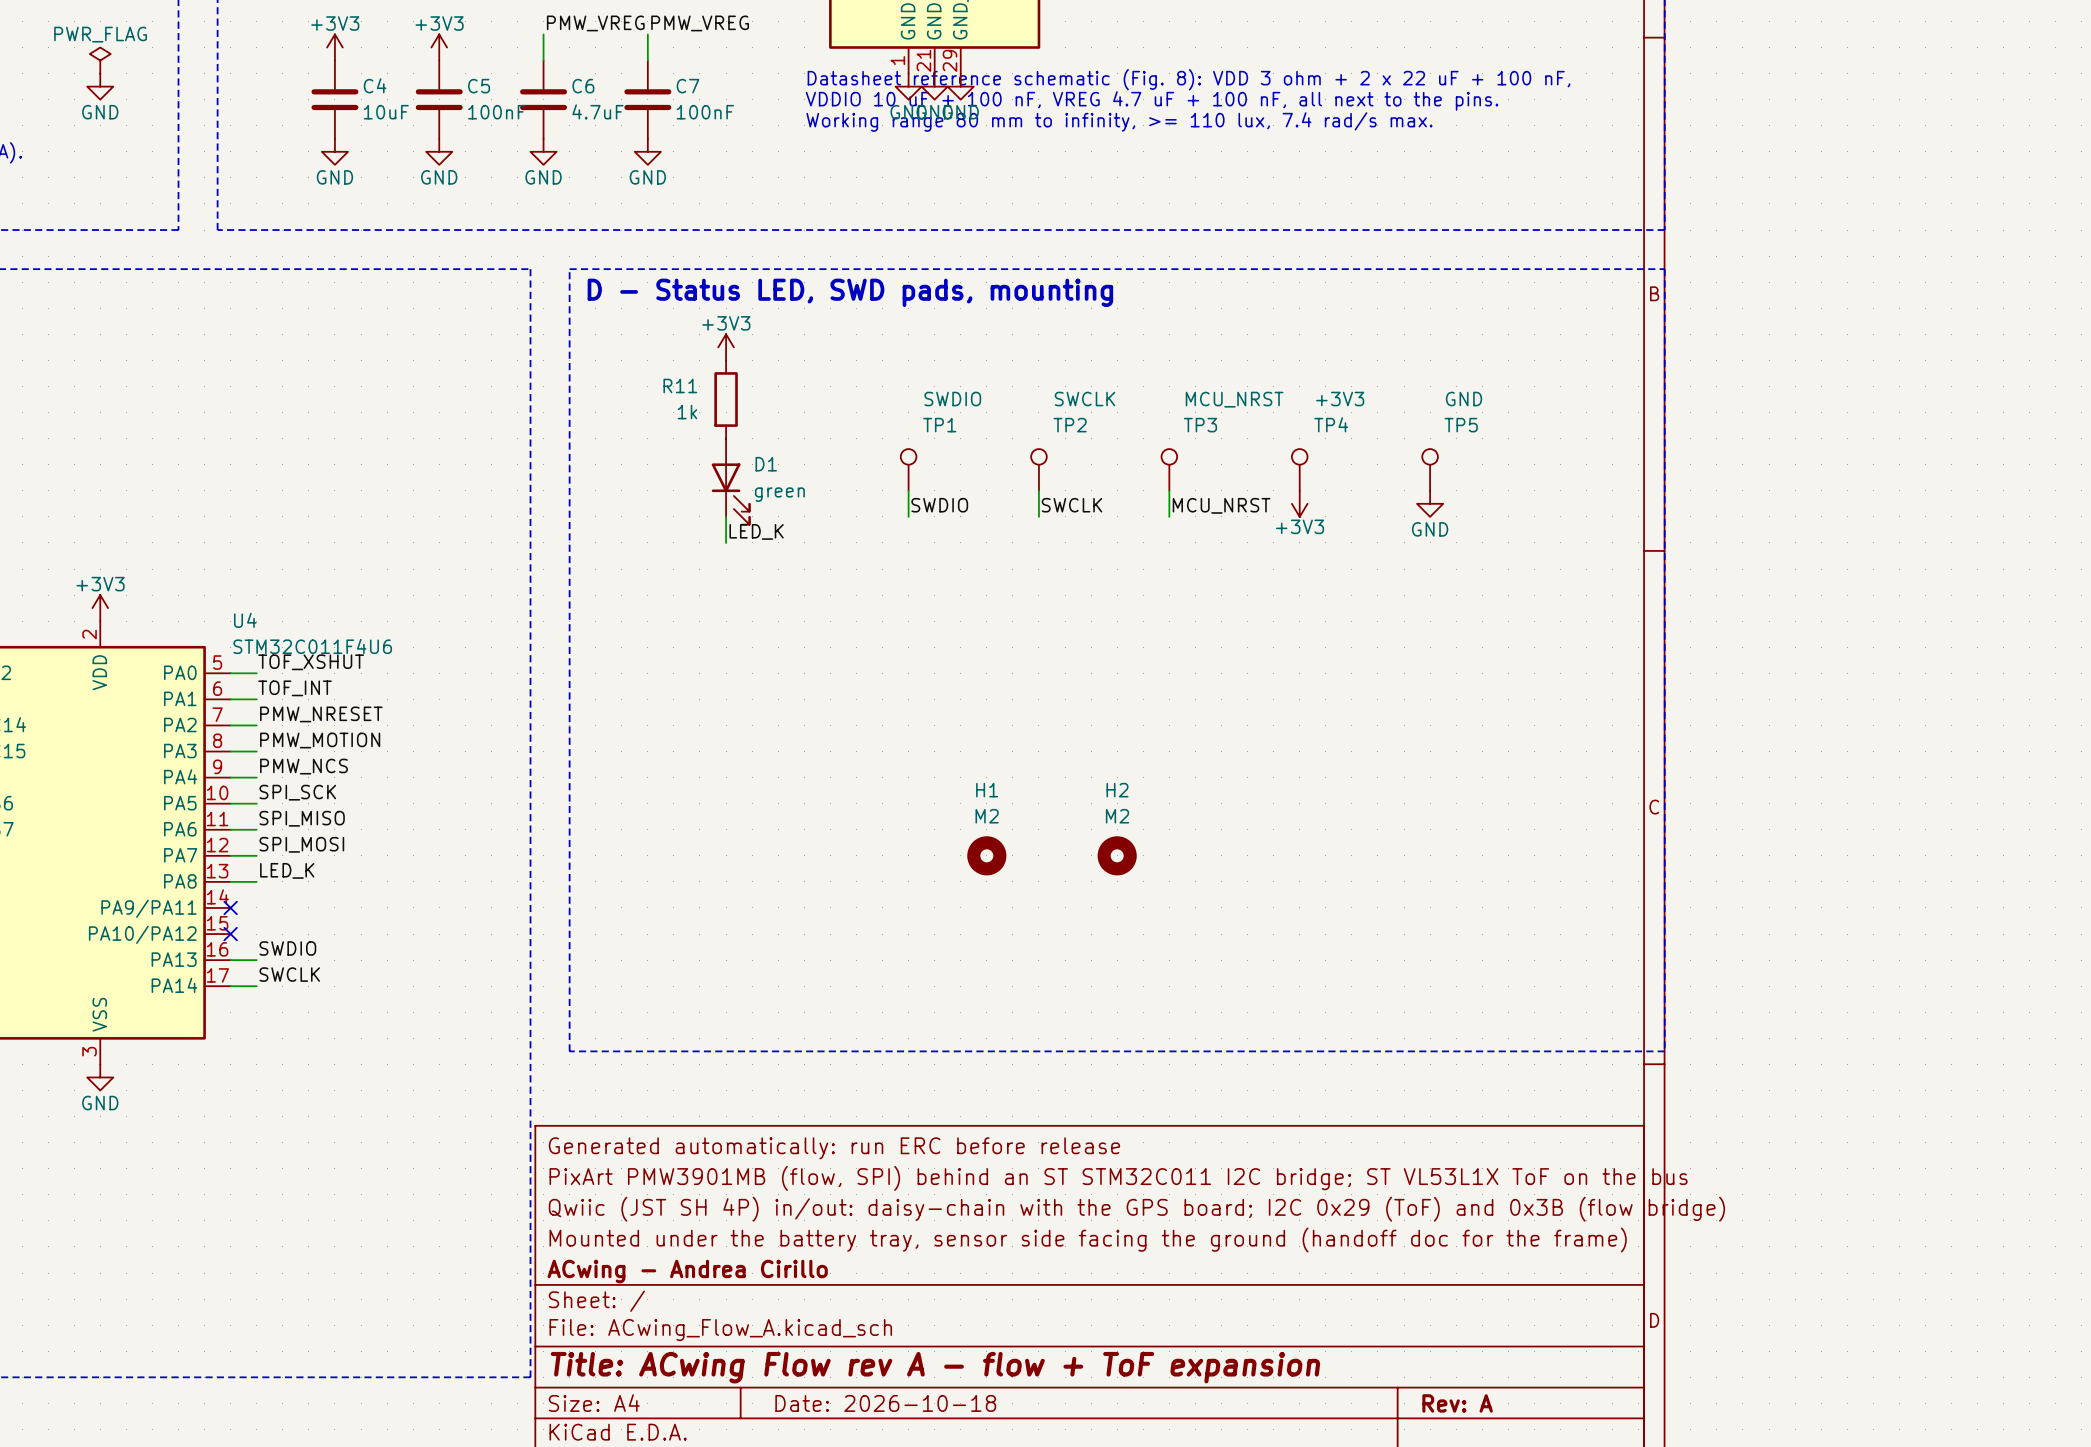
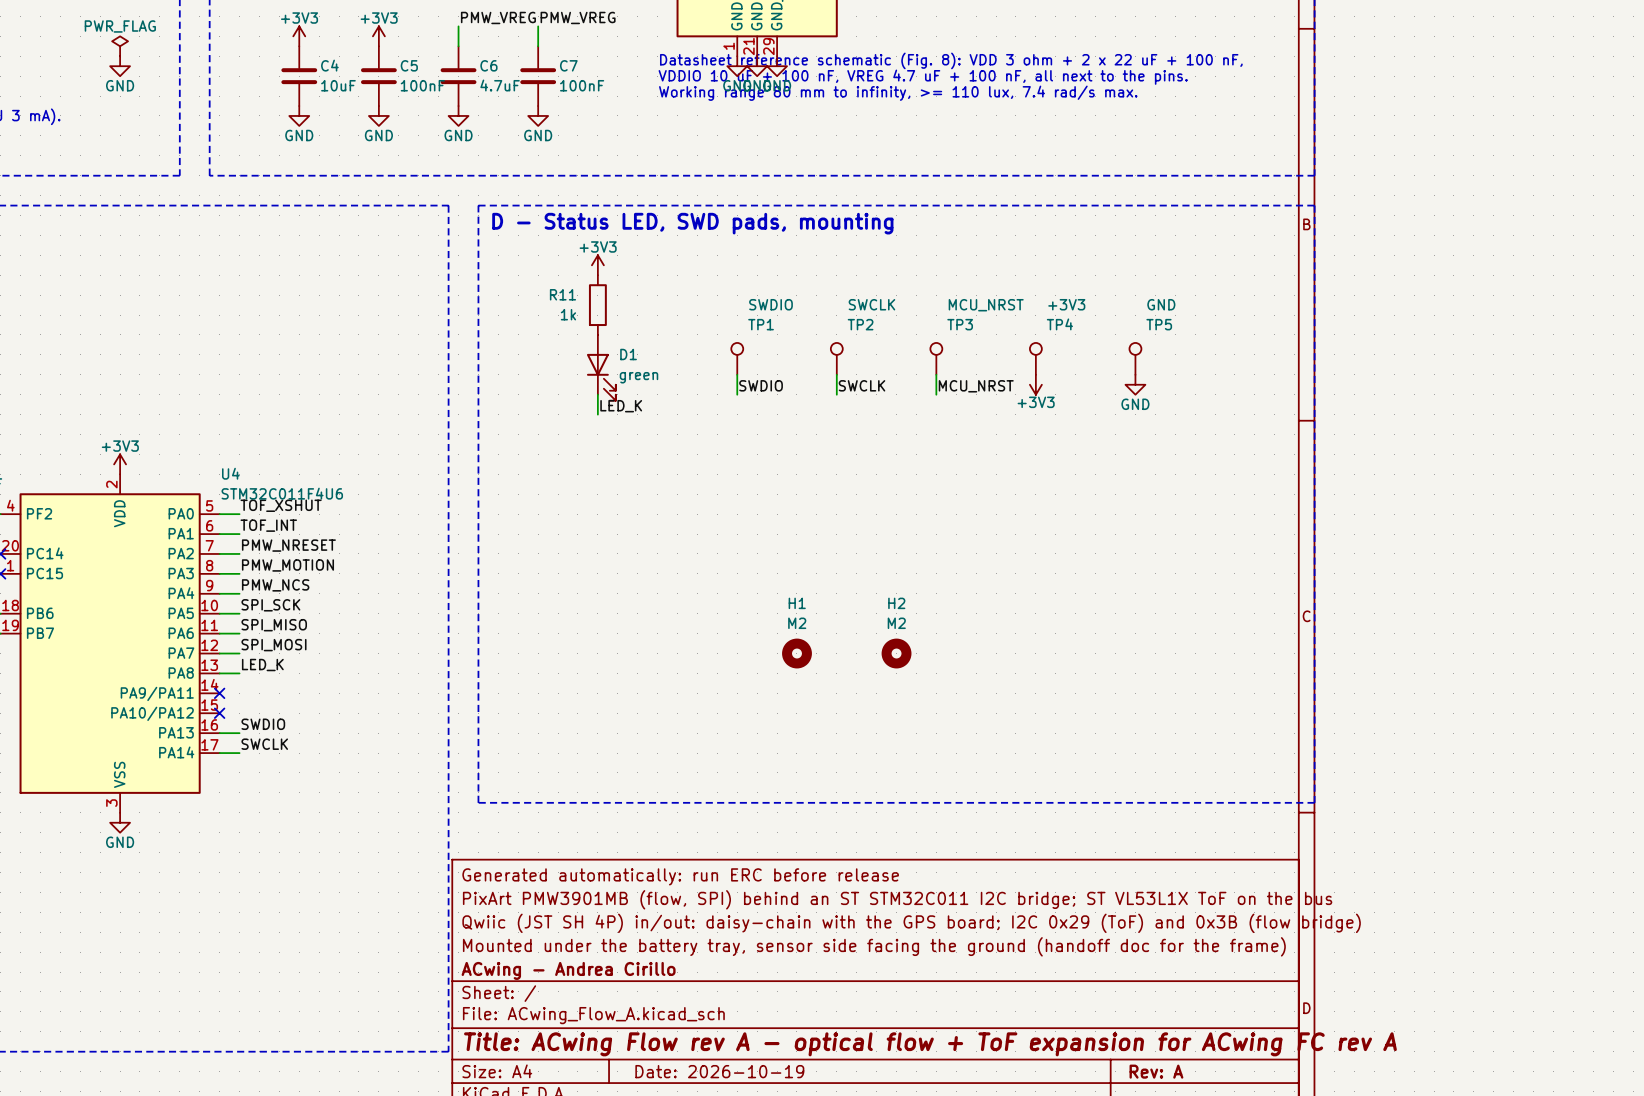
title block: Title: ACwing Flow rev A - flow + ToF expansion (935, 1367) -> Title: ACwing Flow rev A - optical flow + ToF expansion for ACwing FC rev A (930, 1044)
title block: Date: 2026-10-18 (885, 1403) -> Date: 2026-10-19 (719, 1071)

